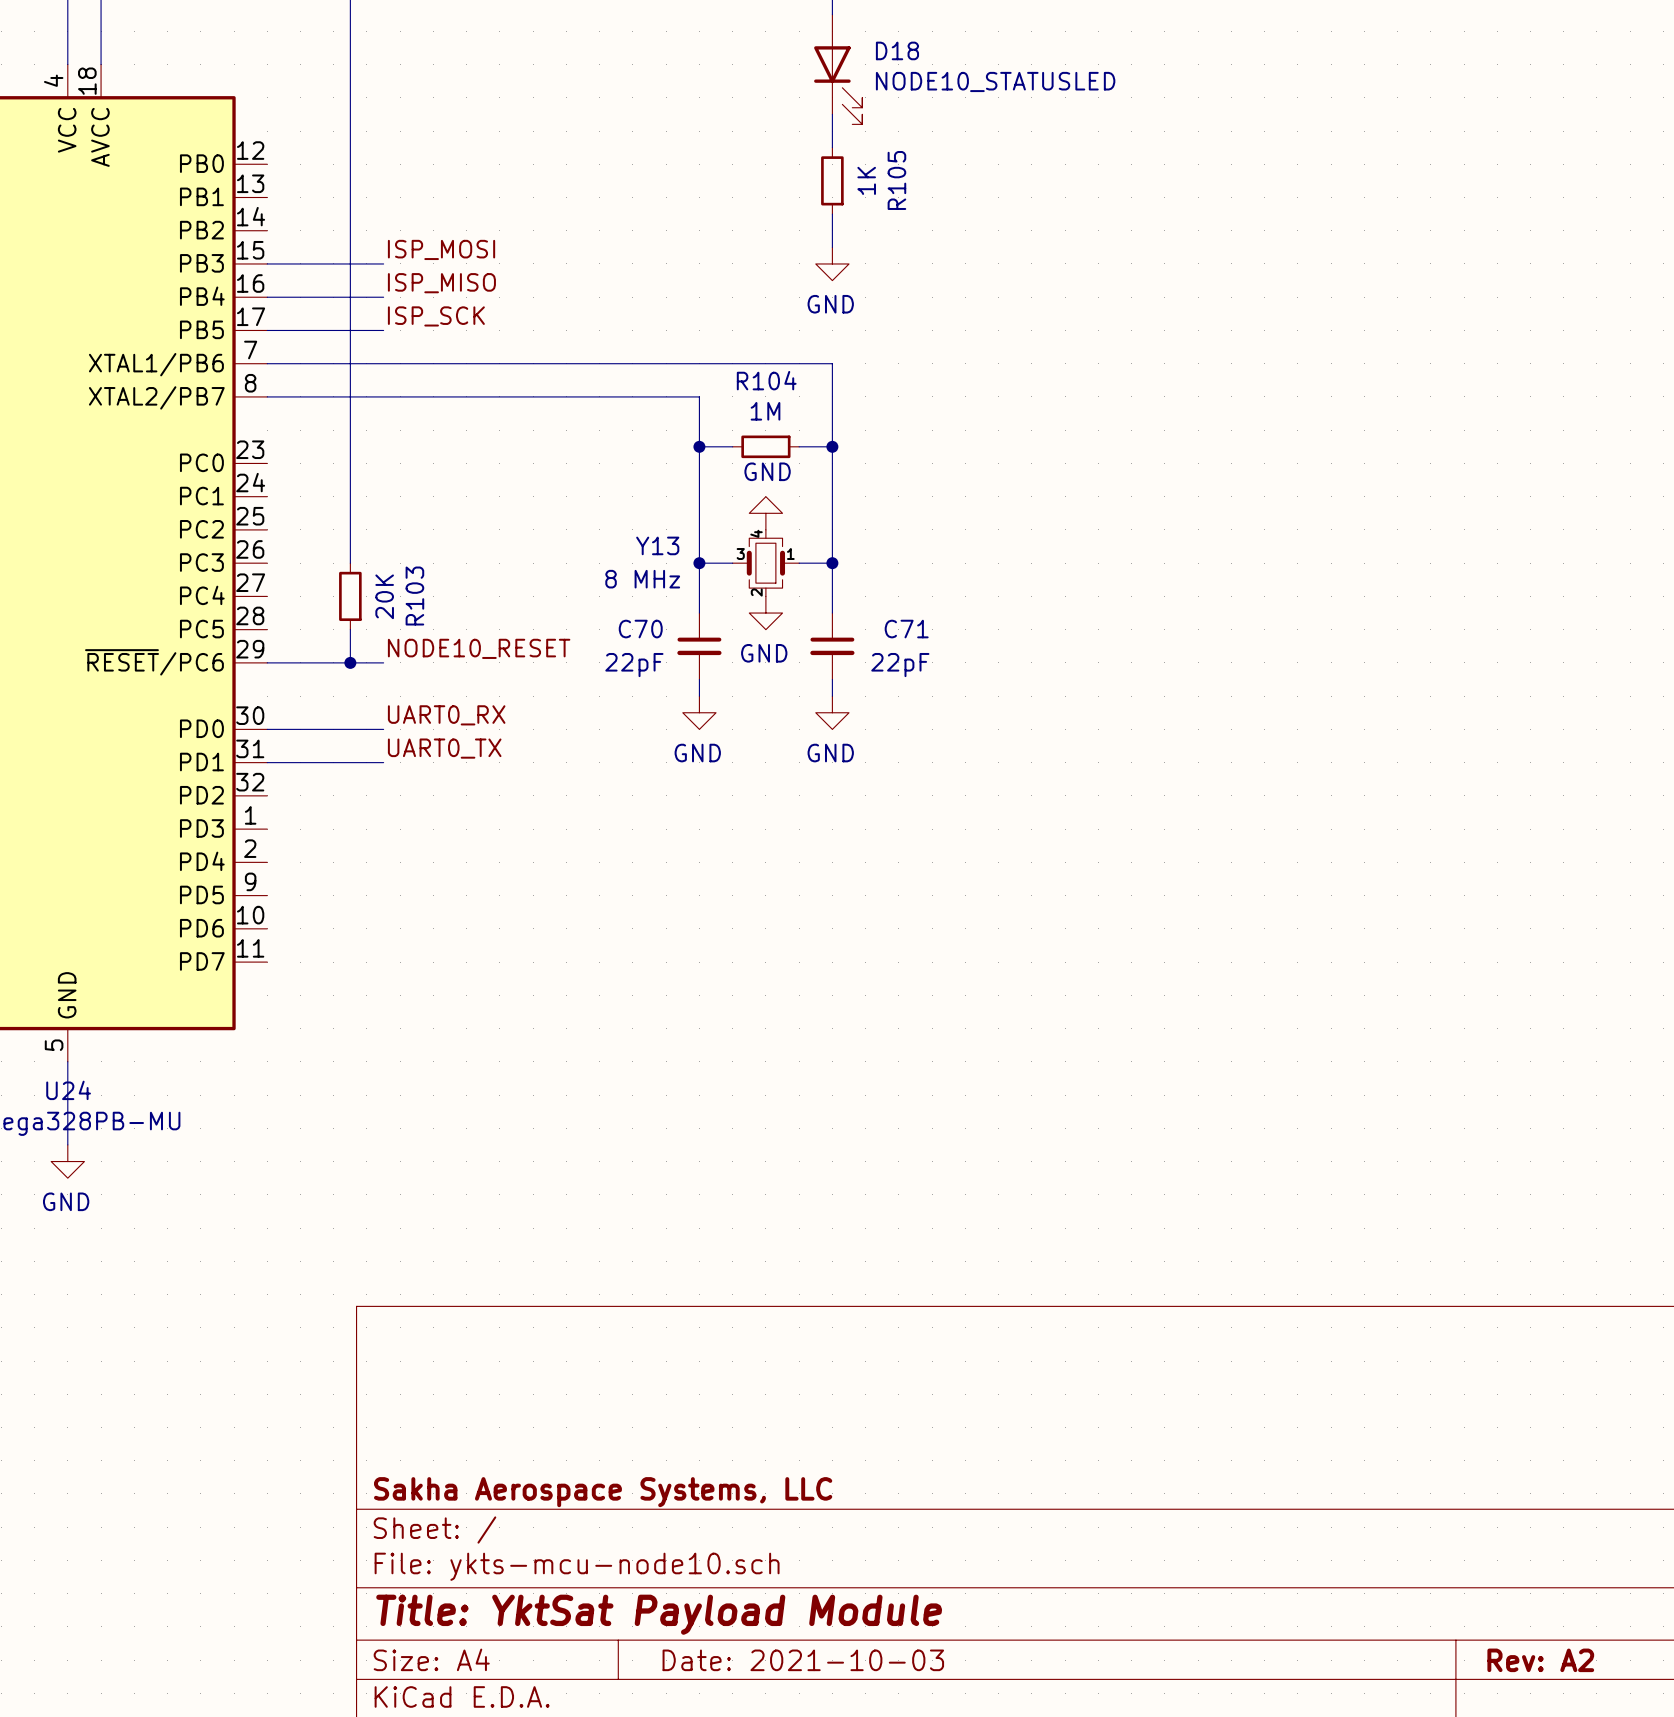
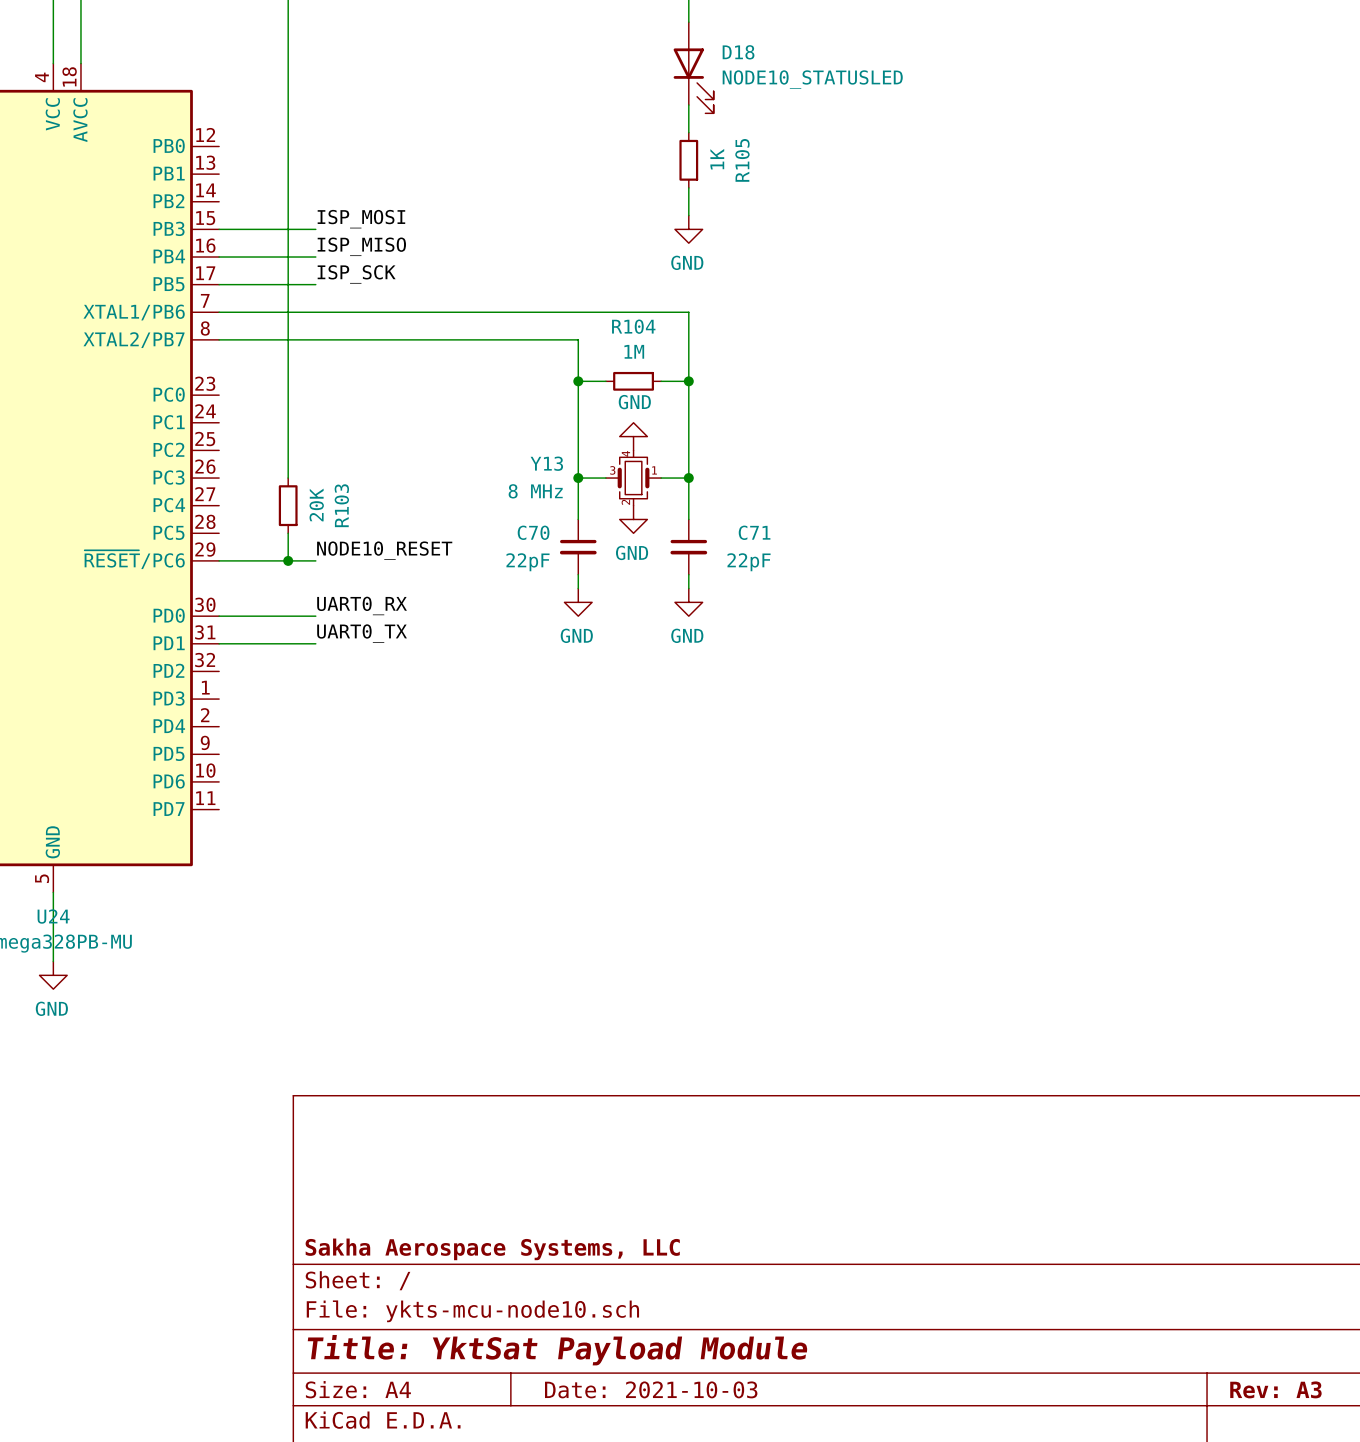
title block: Rev: A2 (1540, 1660) -> Rev: A3 (1275, 1389)

